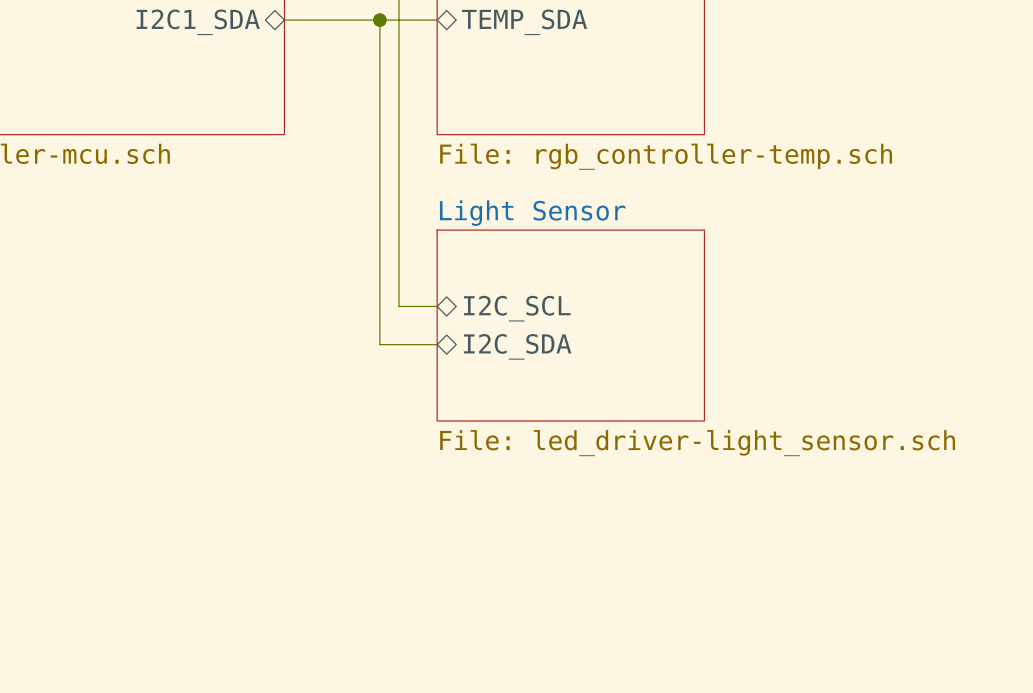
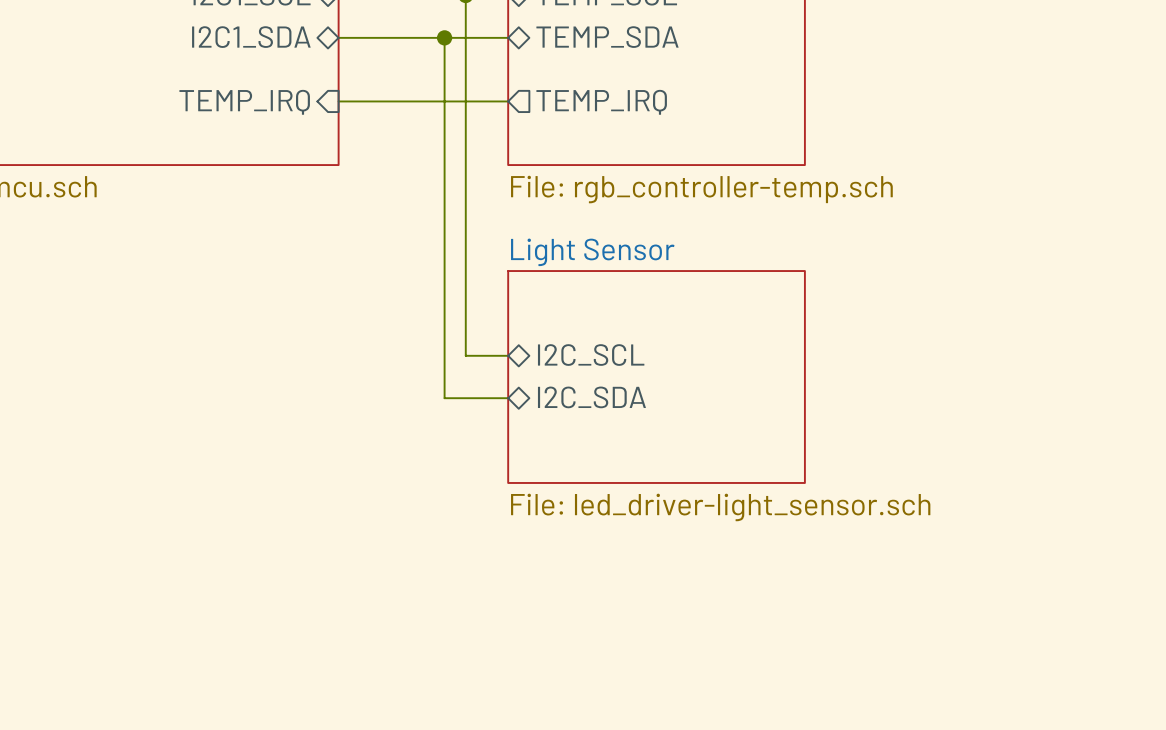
wire: none -> (338, 101) (508, 101)
sheet pin: none -> TEMP_IRQ (244, 102)
sheet pin: none -> TEMP_IRQ (601, 102)

